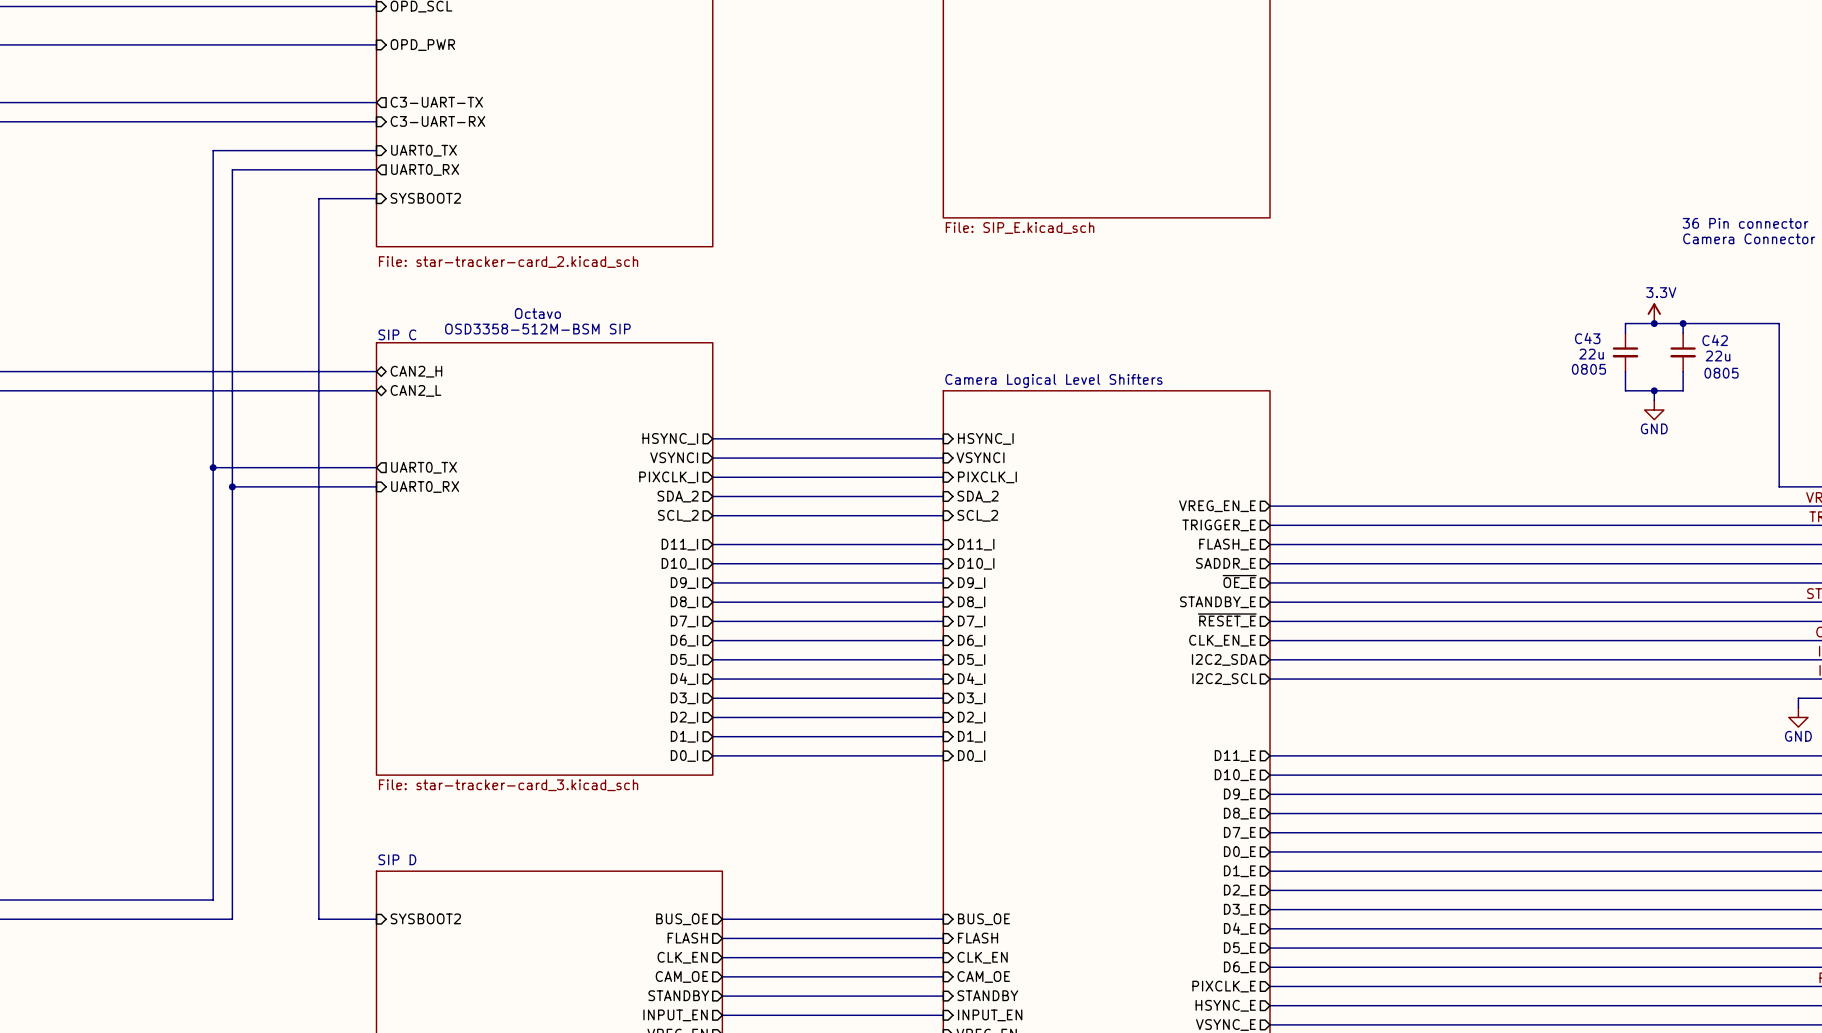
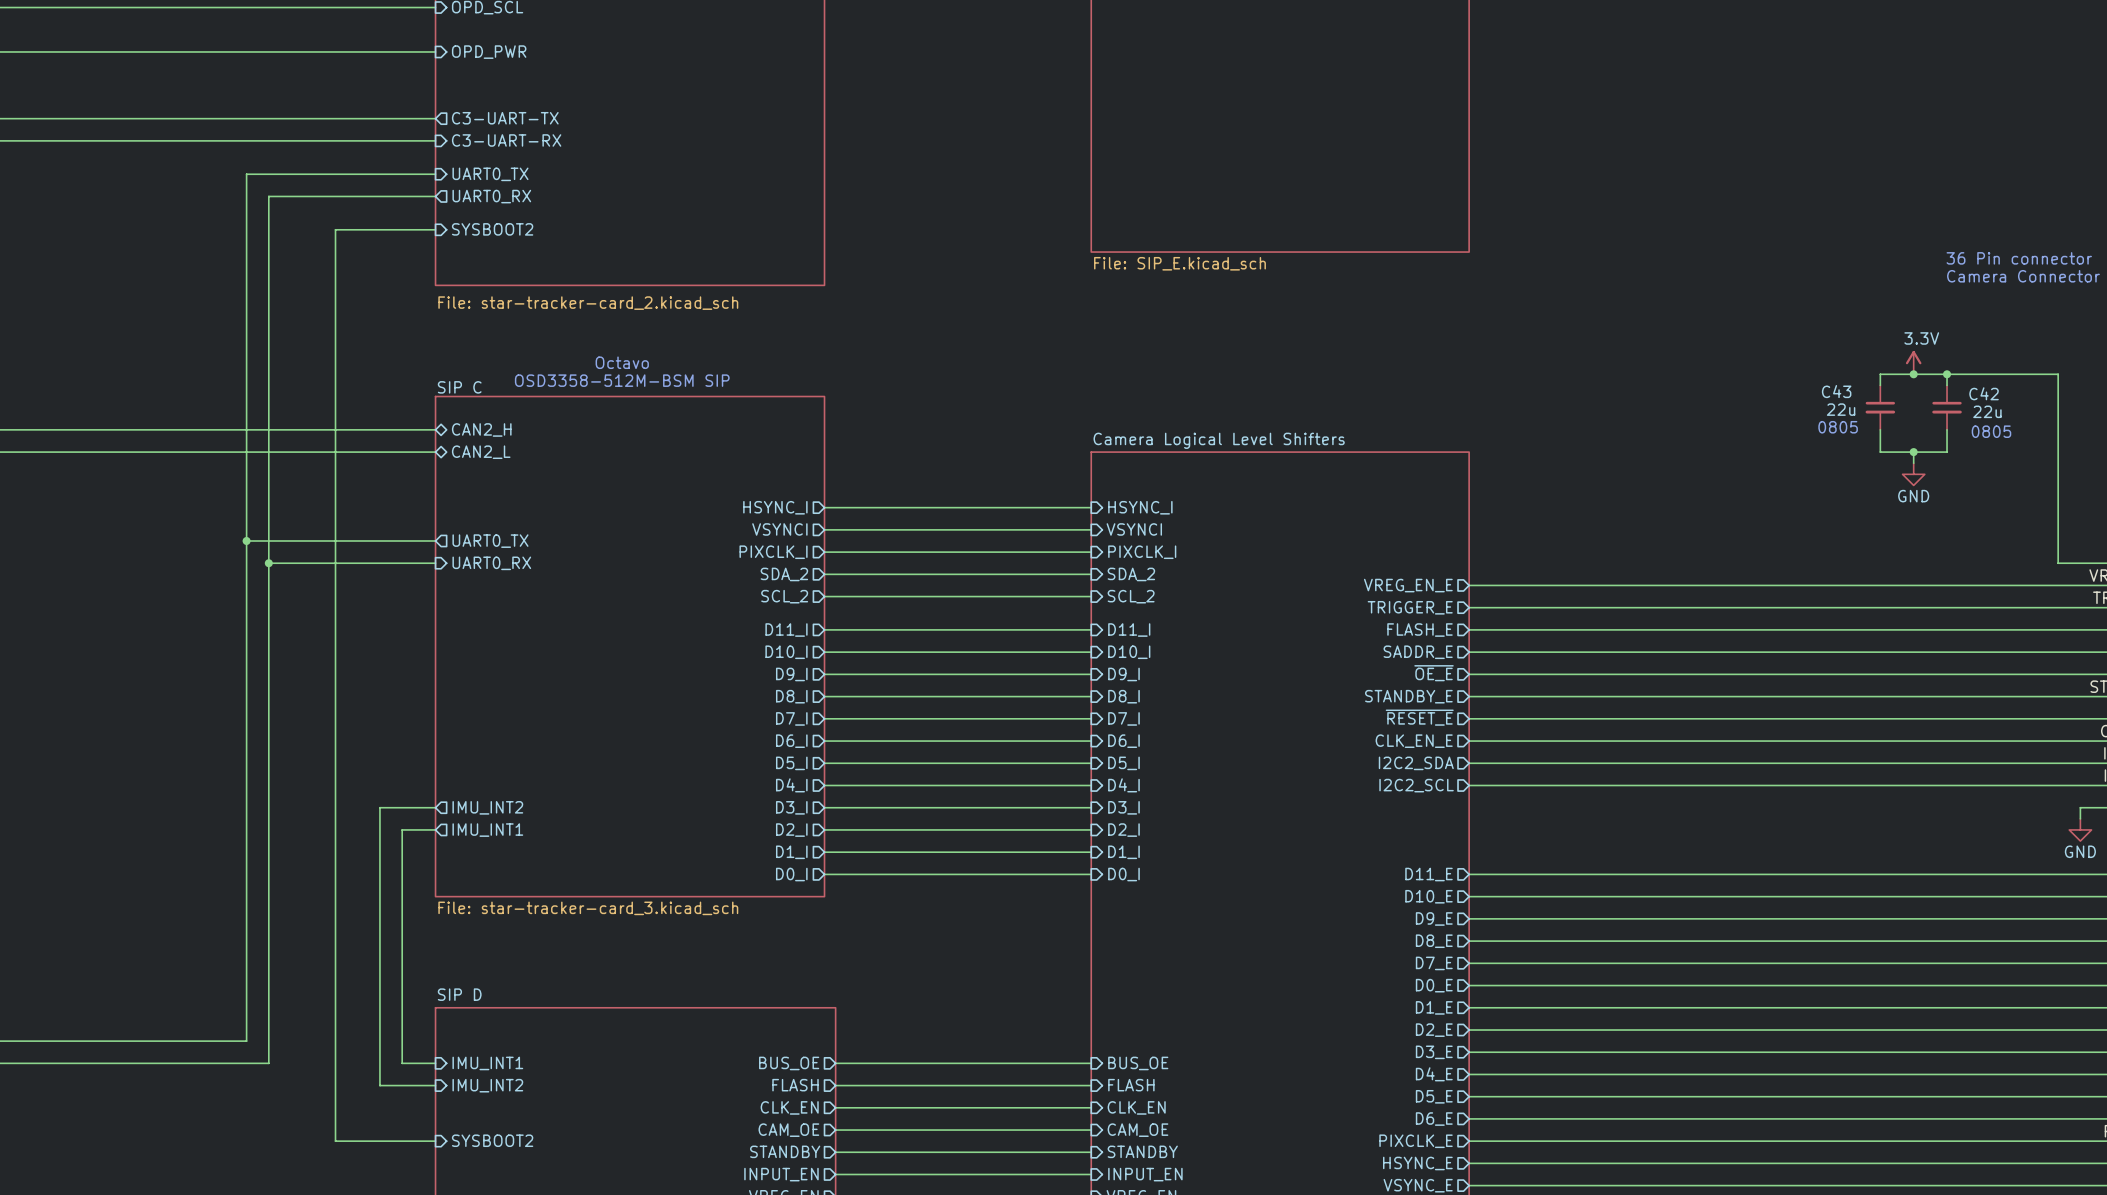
wire: (318, 198) (318, 919) (347, 919) -> (368, 229) (335, 229) (335, 1141) (435, 1141)
wire: none -> (435, 807) (379, 807) (379, 1085) (435, 1085)
sheet pin: none -> IMU_INT2 (487, 807)
wire: none -> (435, 829) (402, 829) (402, 1063)
sheet pin: none -> IMU_INT1 (487, 830)
sheet pin: SYSBOOT2 (425, 918) -> IMU_INT1 (487, 1063)
sheet pin: none -> IMU_INT2 (487, 1085)
sheet pin: none -> SYSBOOT2 (492, 1140)

